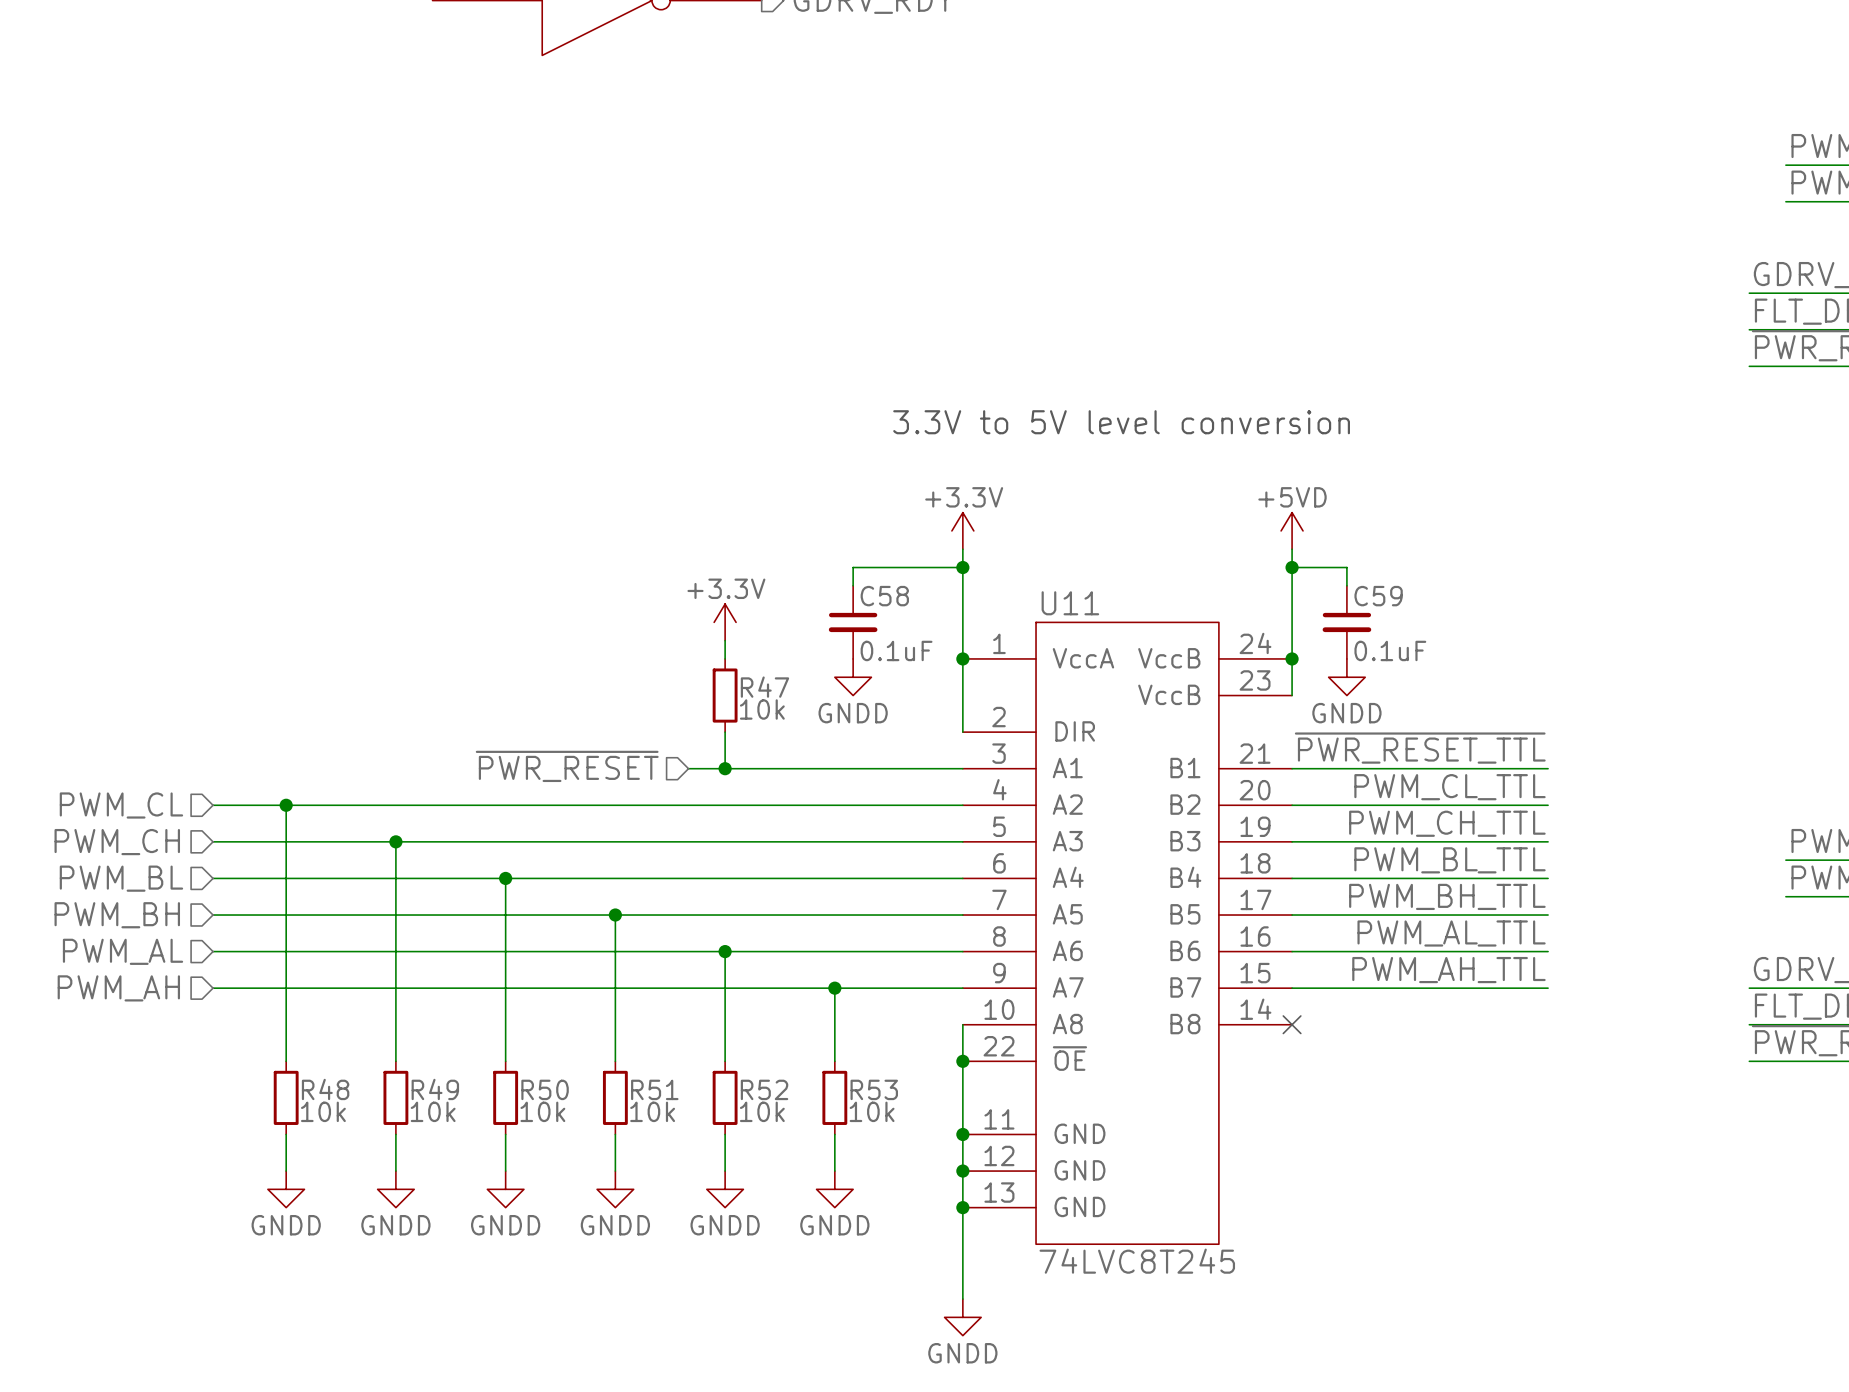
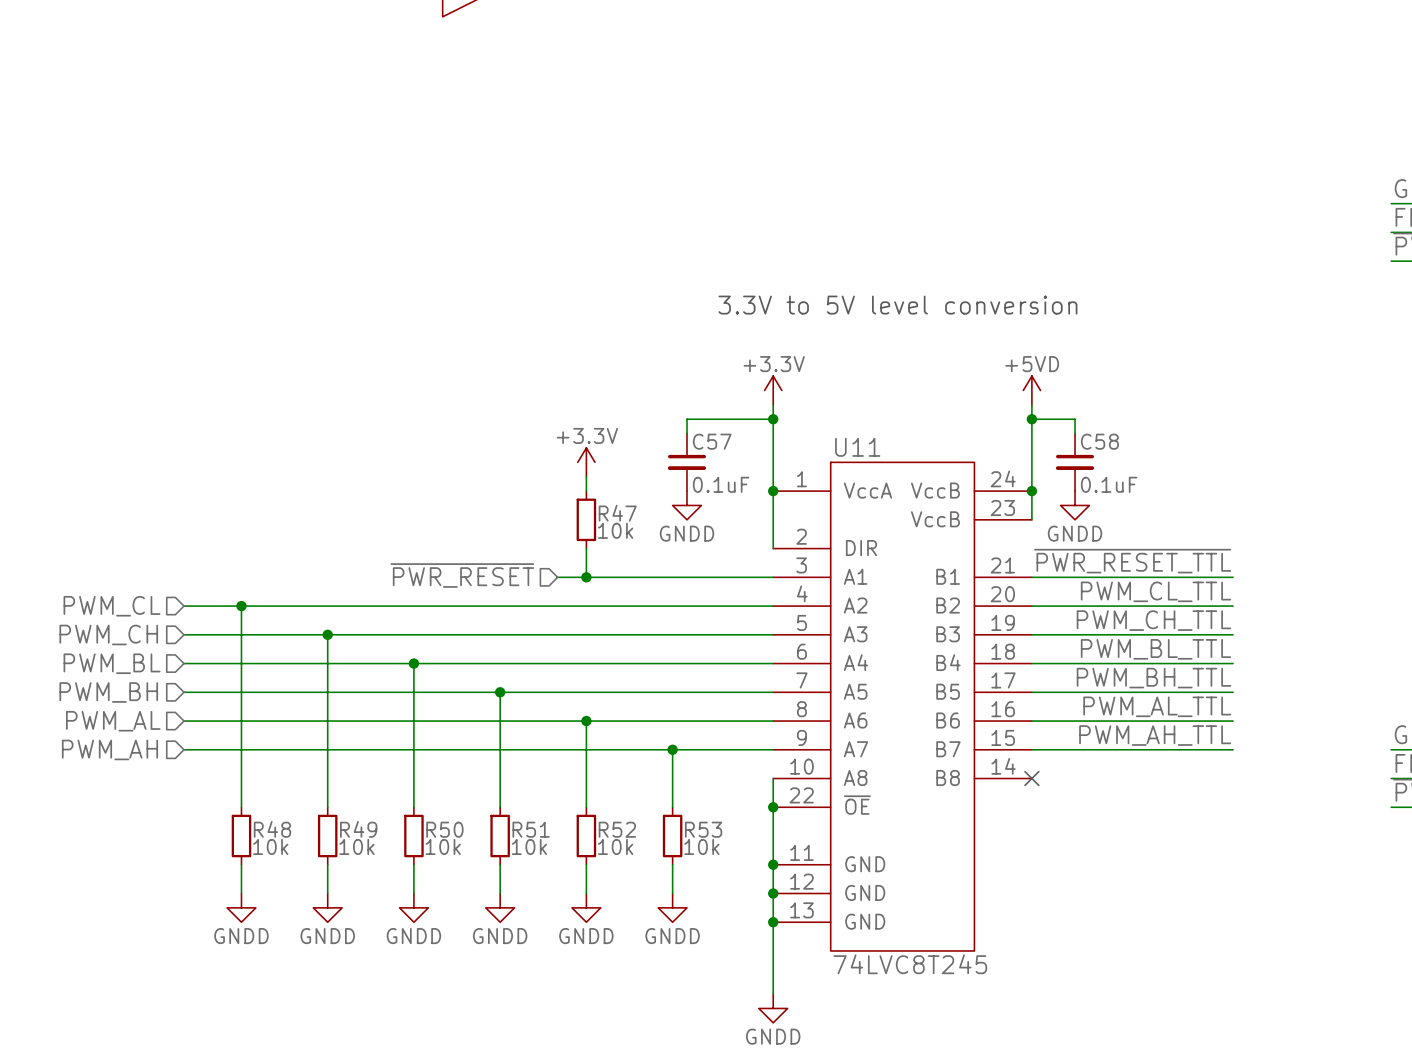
C58 name: C58 (884, 596) -> C57 (712, 441)
C59 name: C59 (1378, 596) -> C58 (1099, 441)

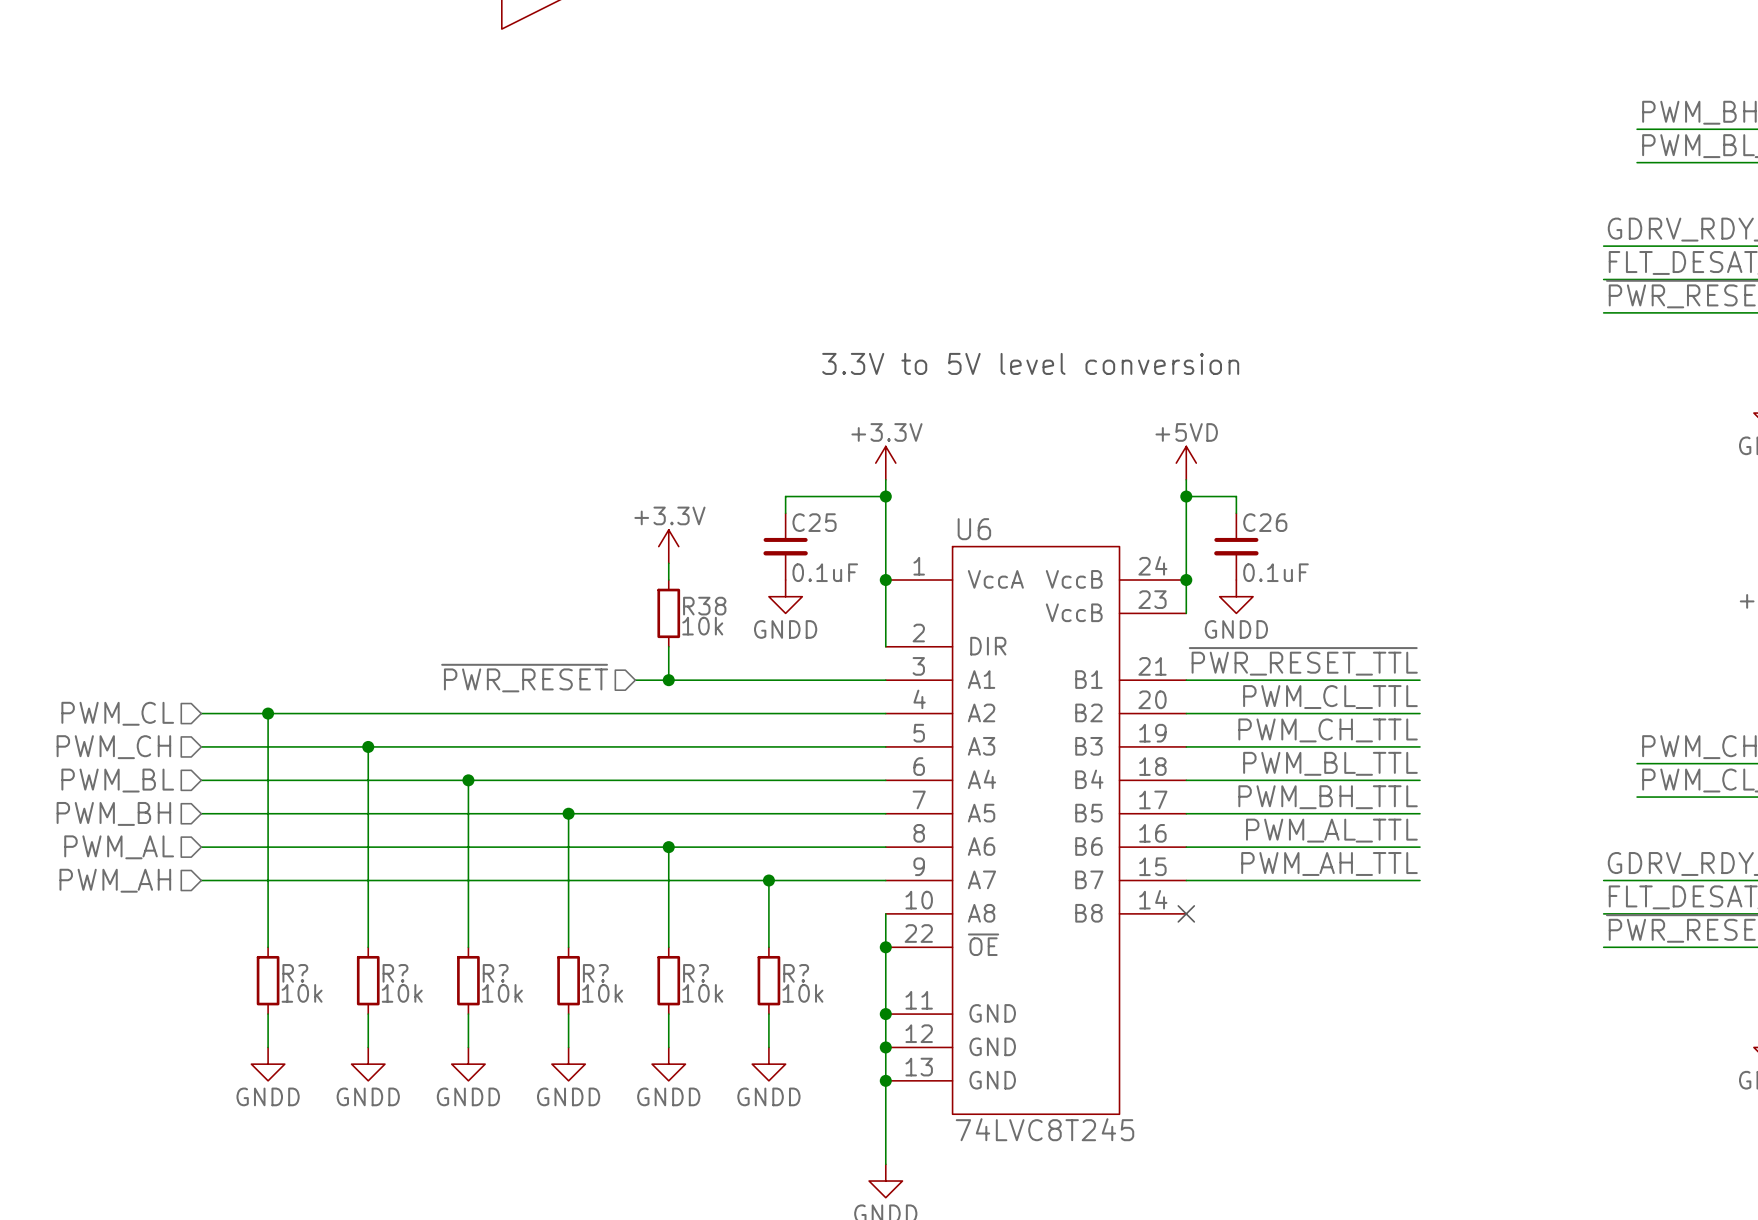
C57 name: C57 (712, 441) -> C25 (814, 522)
C58 name: C58 (1099, 441) -> C26 (1265, 522)
U11 name: U11 (857, 447) -> U6 (974, 529)
R47 name: R47 (617, 513) -> R38 (704, 606)
R48 name: R48 (272, 829) -> R? (295, 973)
R49 name: R49 (358, 829) -> R? (395, 973)
R50 name: R50 (444, 829) -> R? (495, 973)
R51 name: R51 (531, 829) -> R? (595, 973)
R52 name: R52 (617, 829) -> R? (695, 973)
R53 name: R53 (703, 829) -> R? (796, 973)

